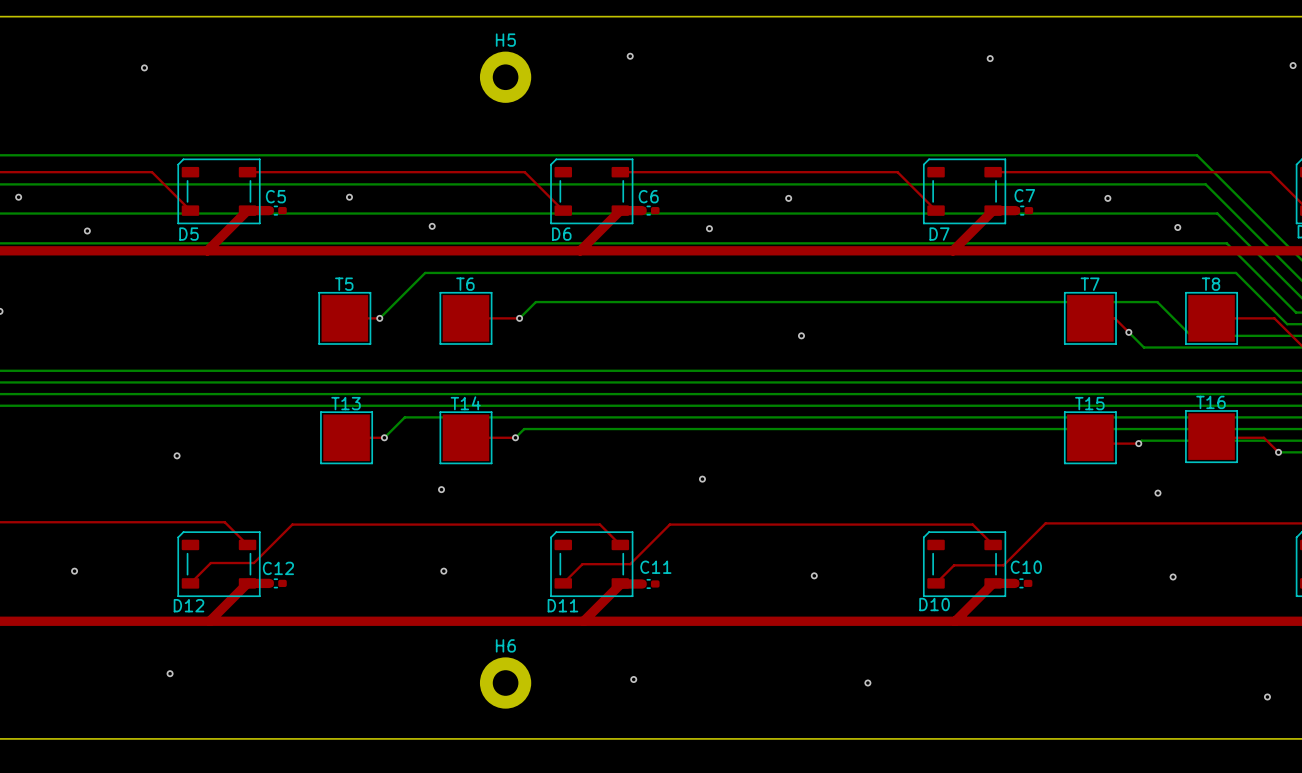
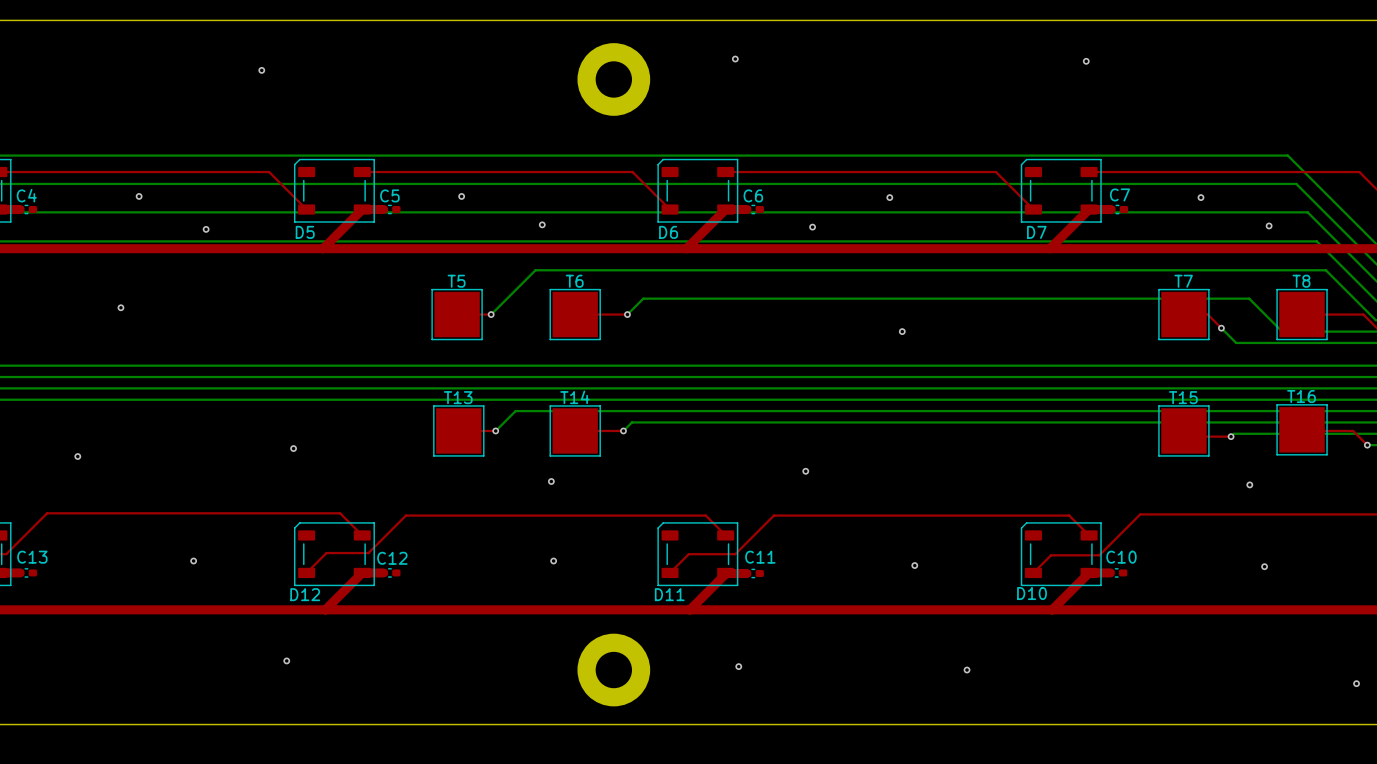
H5: (505, 77) -> none
part: none -> (613, 79)
H6: (505, 683) -> none
part: none -> (613, 670)

